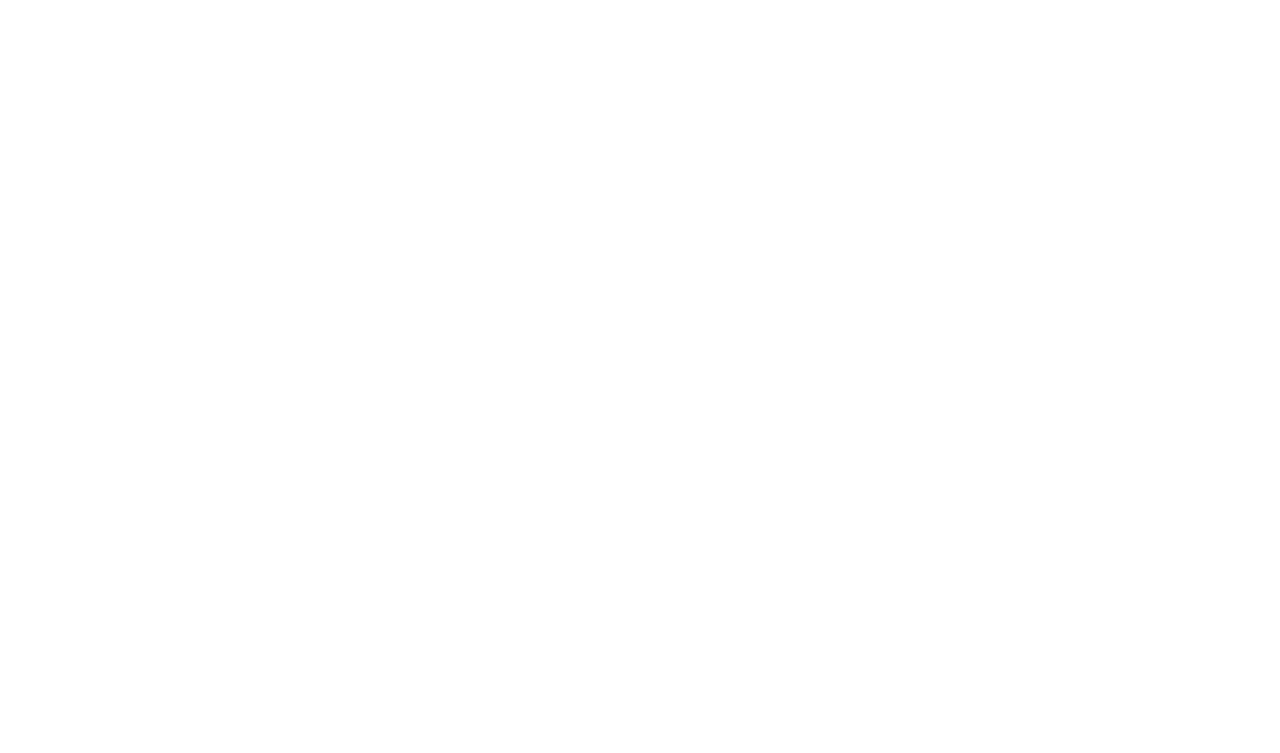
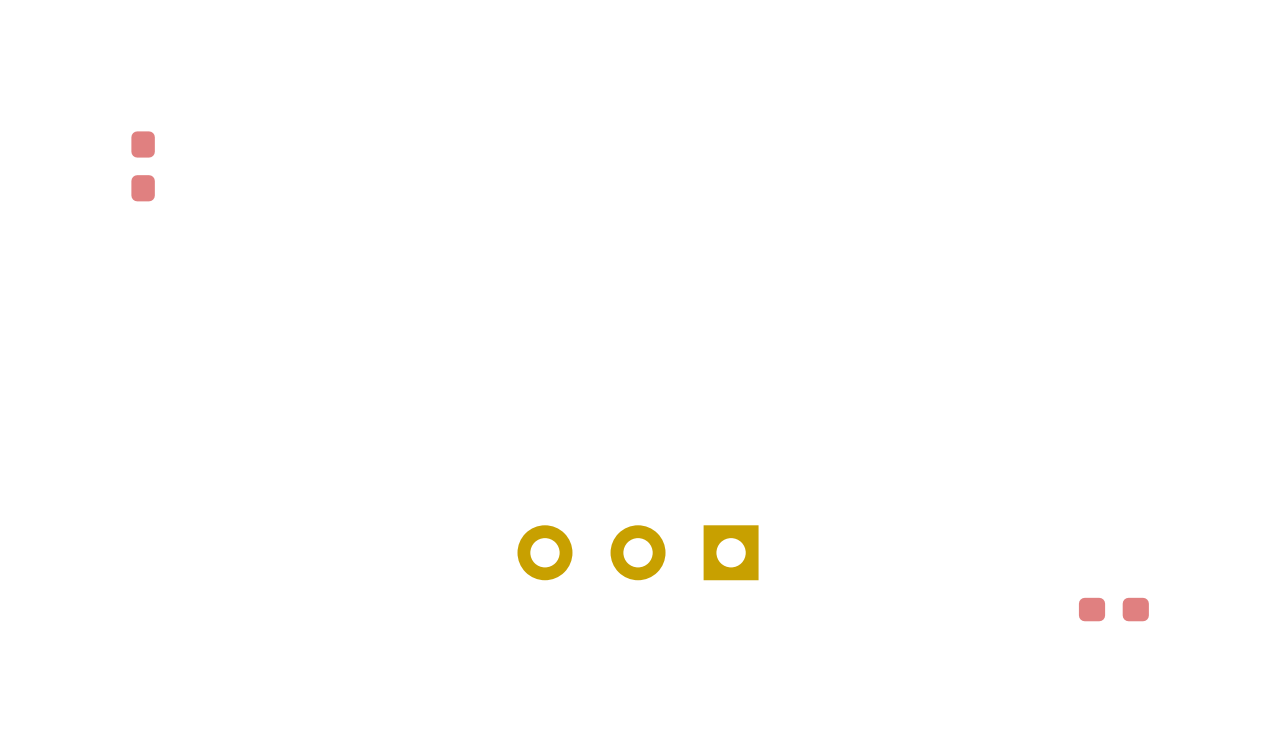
part: none -> (143, 166)
part: none -> (638, 552)
part: none -> (1113, 609)

